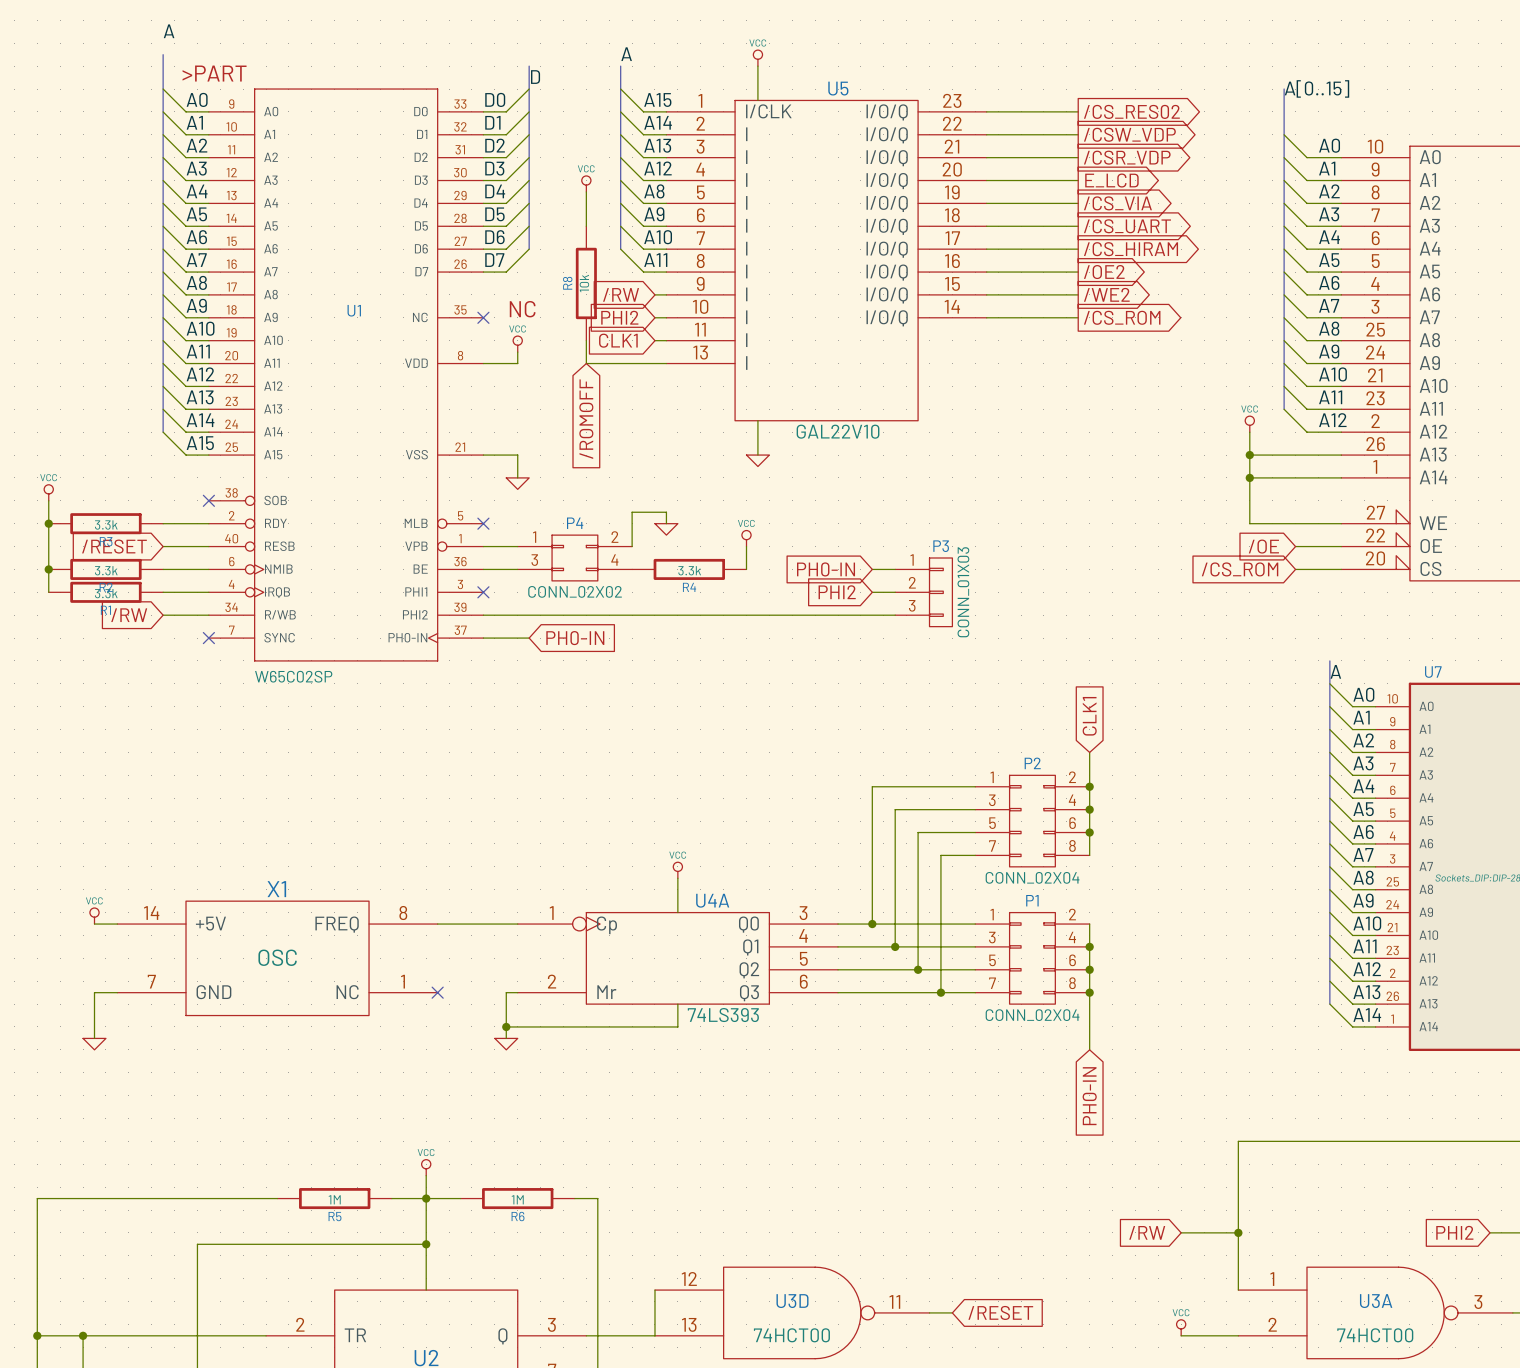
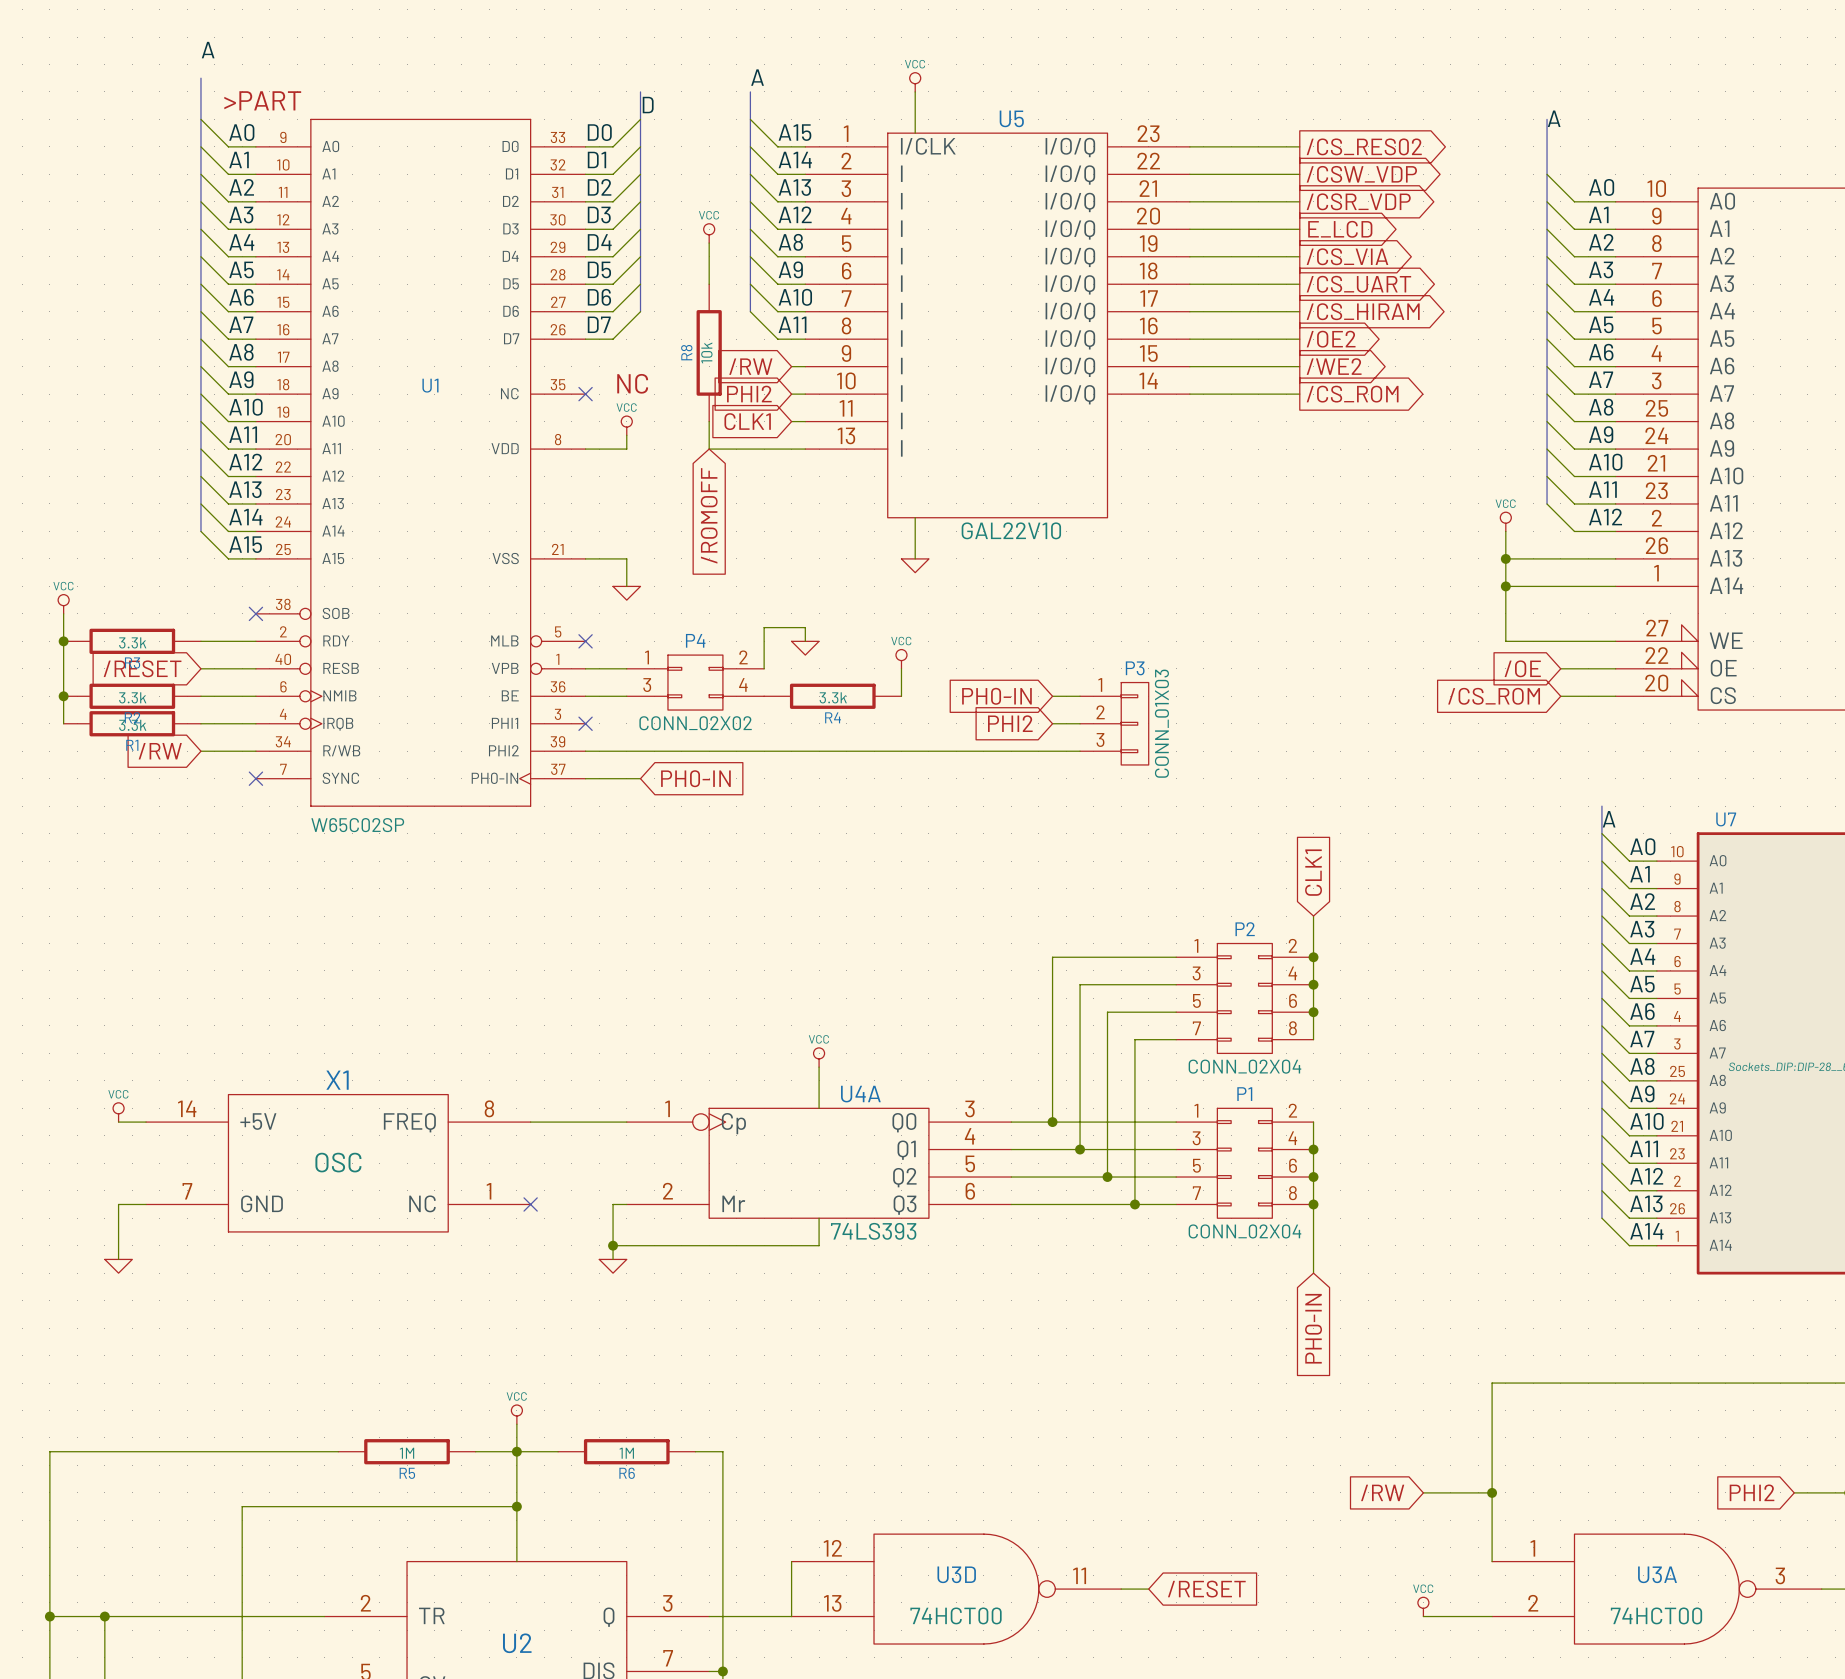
label: A[0..15] (1316, 88) -> A (1554, 118)

